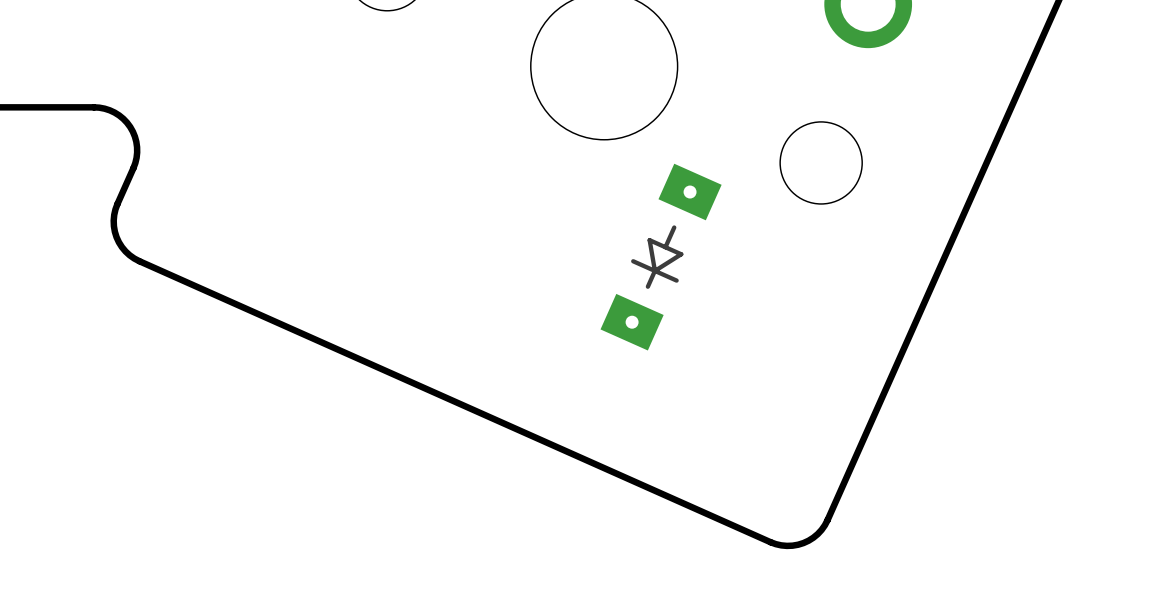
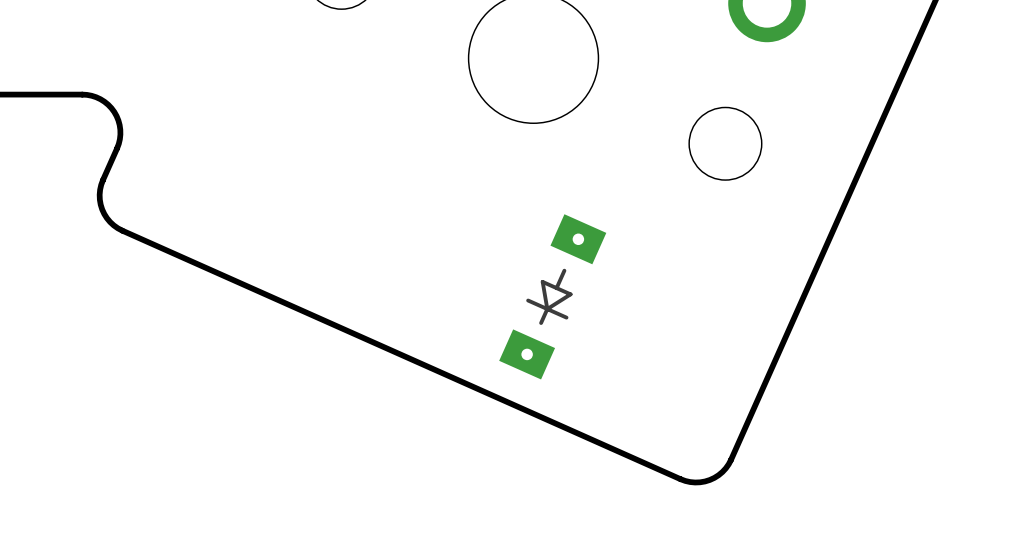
part position: (661, 257) -> (552, 296)

